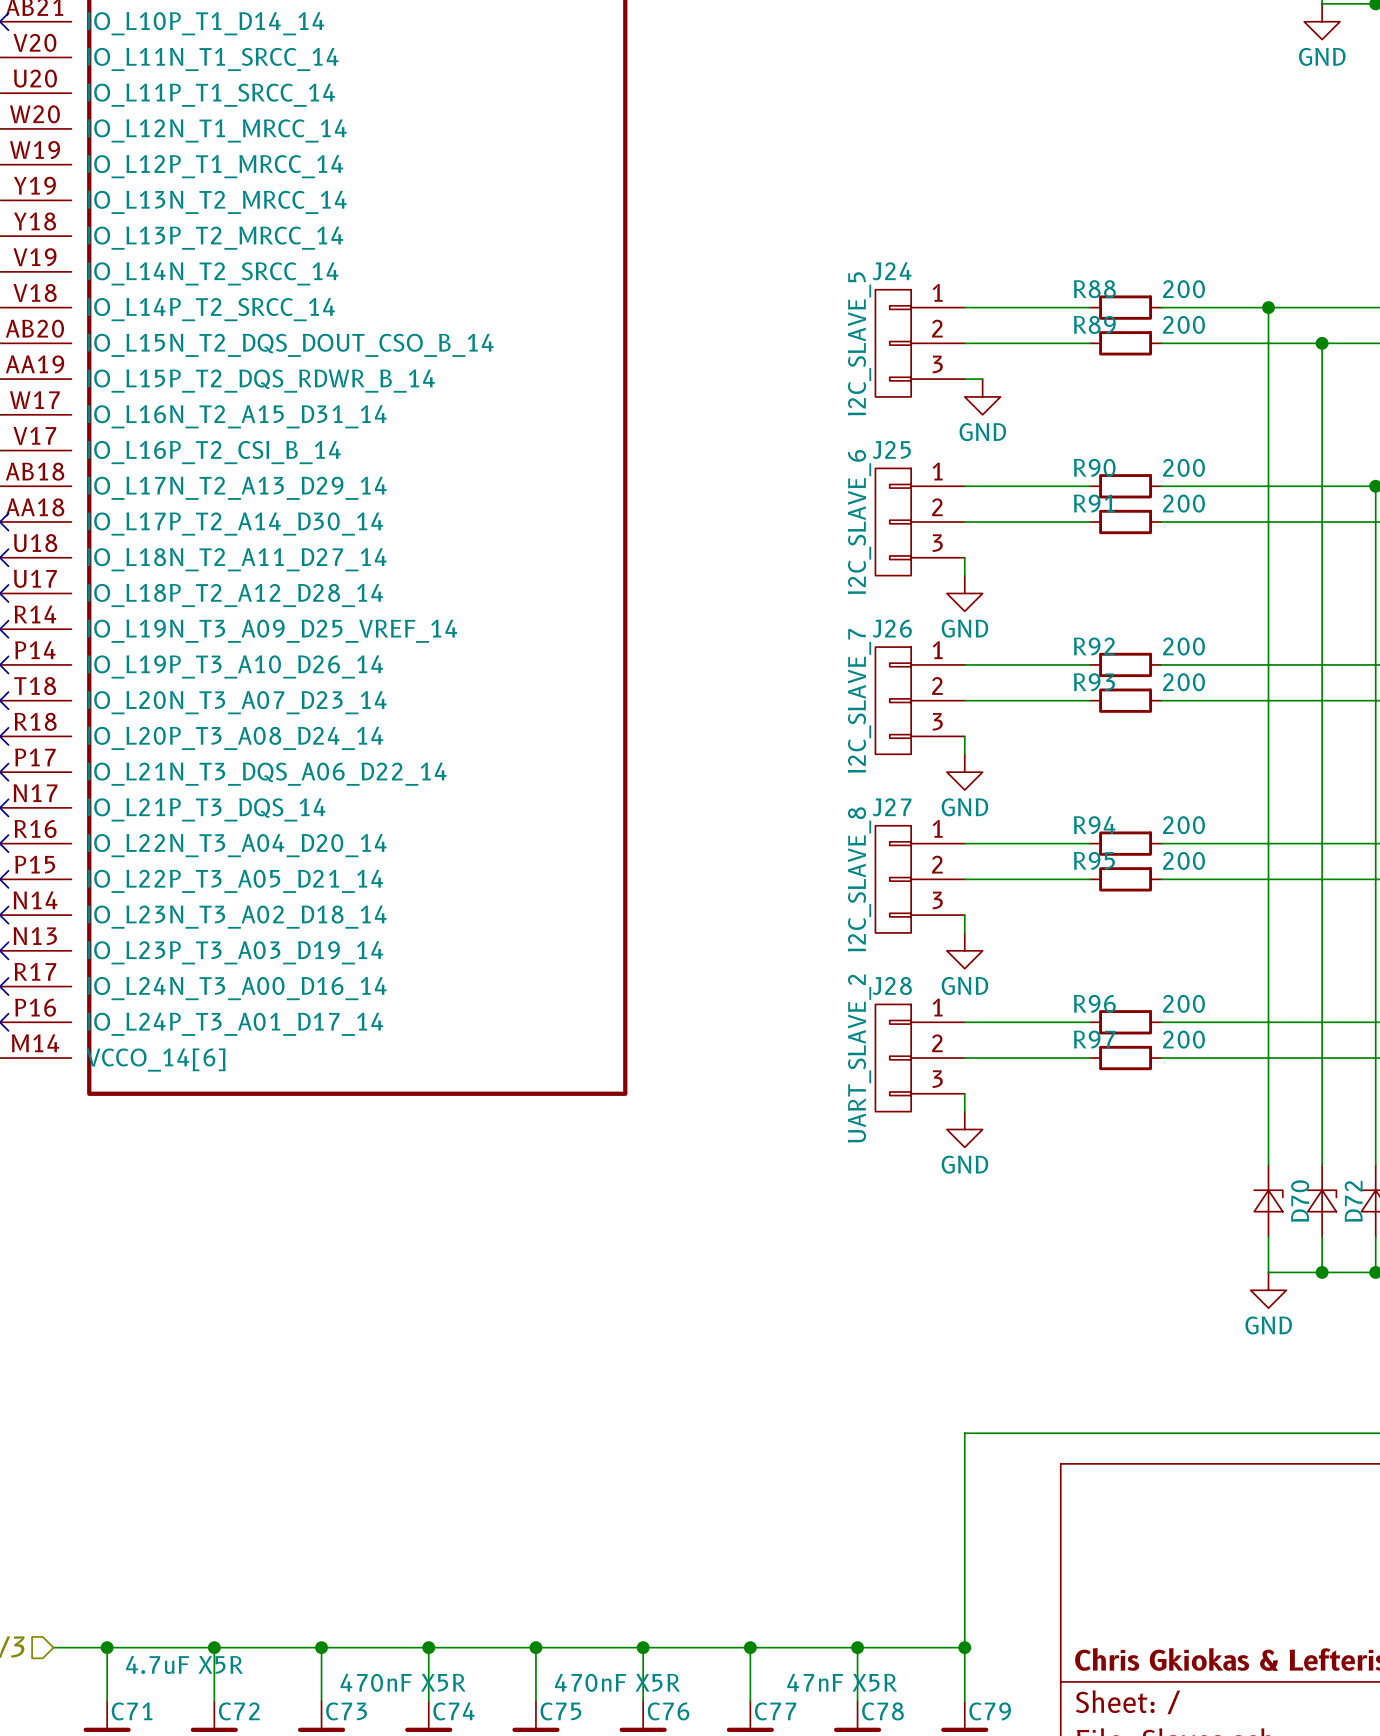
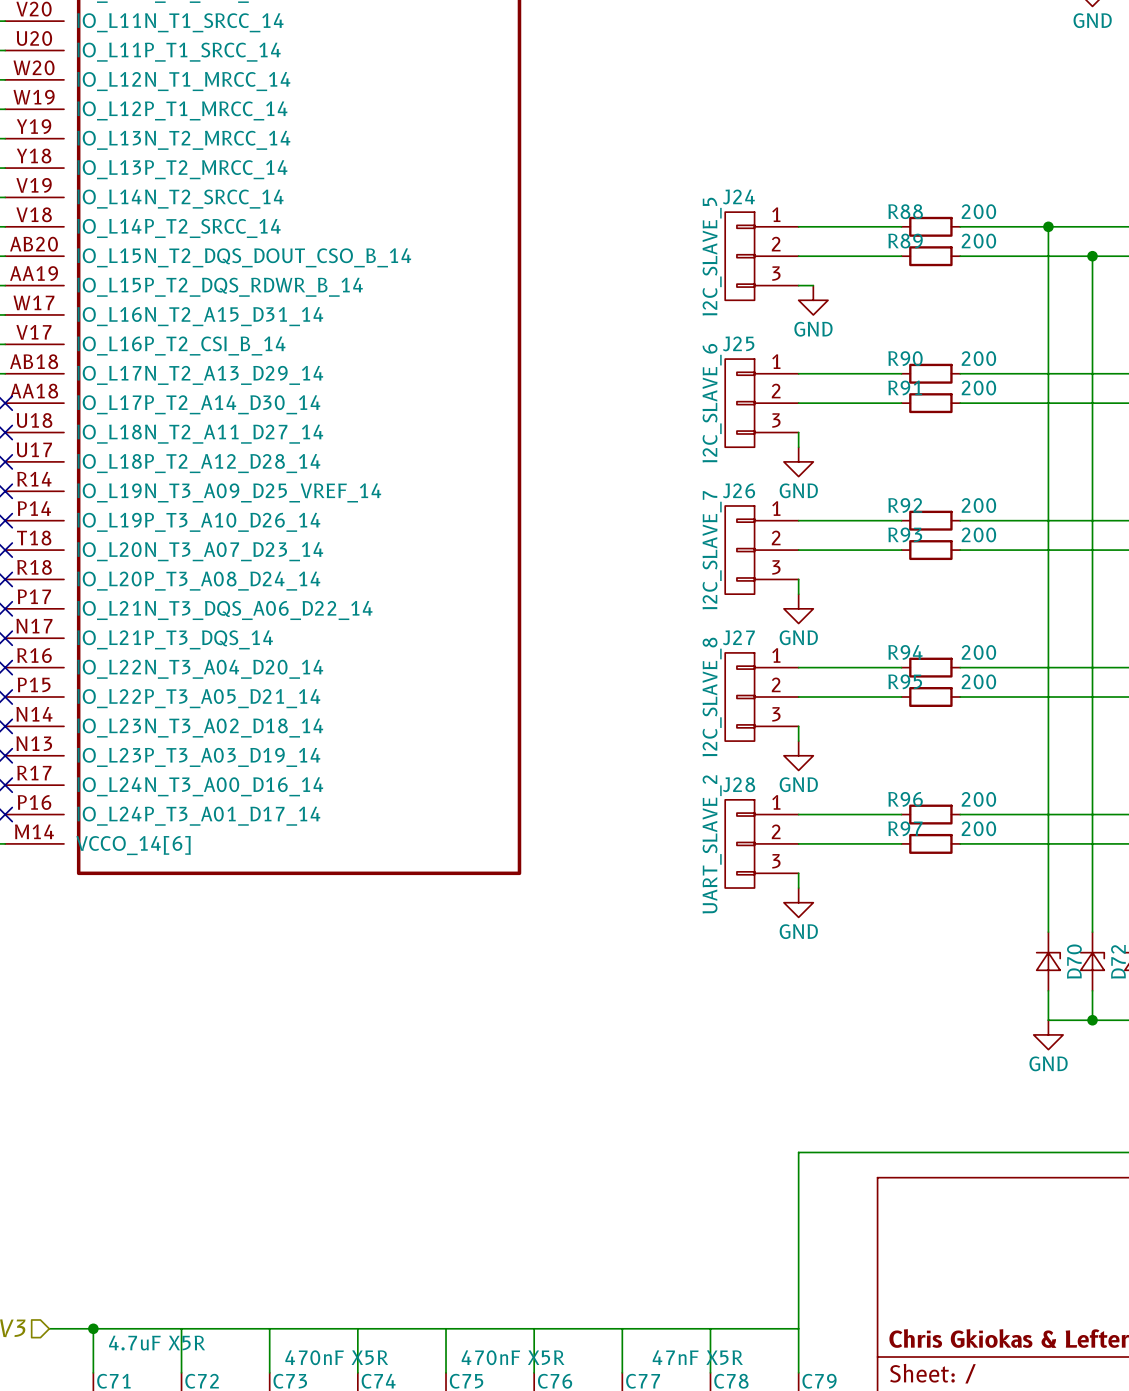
junction: (214, 1647) -> none
junction: (321, 1647) -> none
junction: (428, 1647) -> none
junction: (535, 1647) -> none
junction: (643, 1647) -> none
junction: (750, 1647) -> none
junction: (857, 1647) -> none
junction: (964, 1647) -> none

